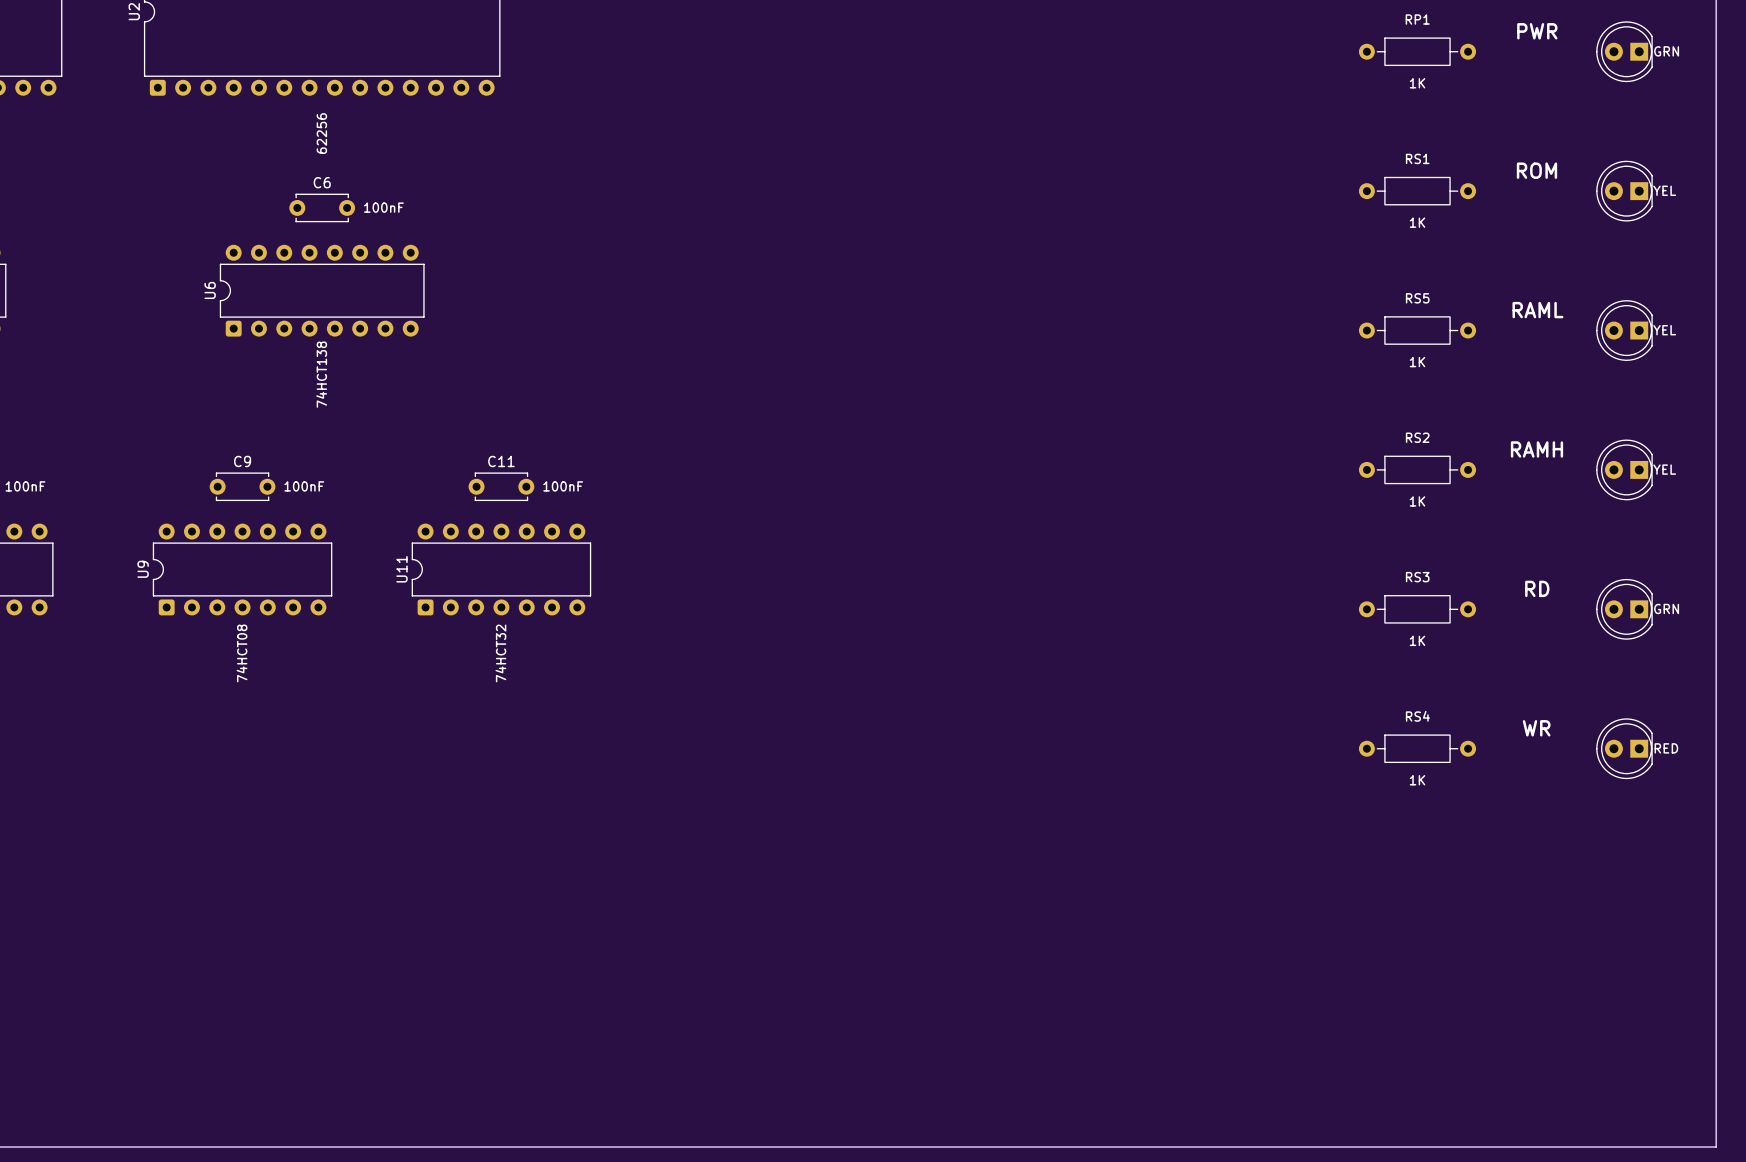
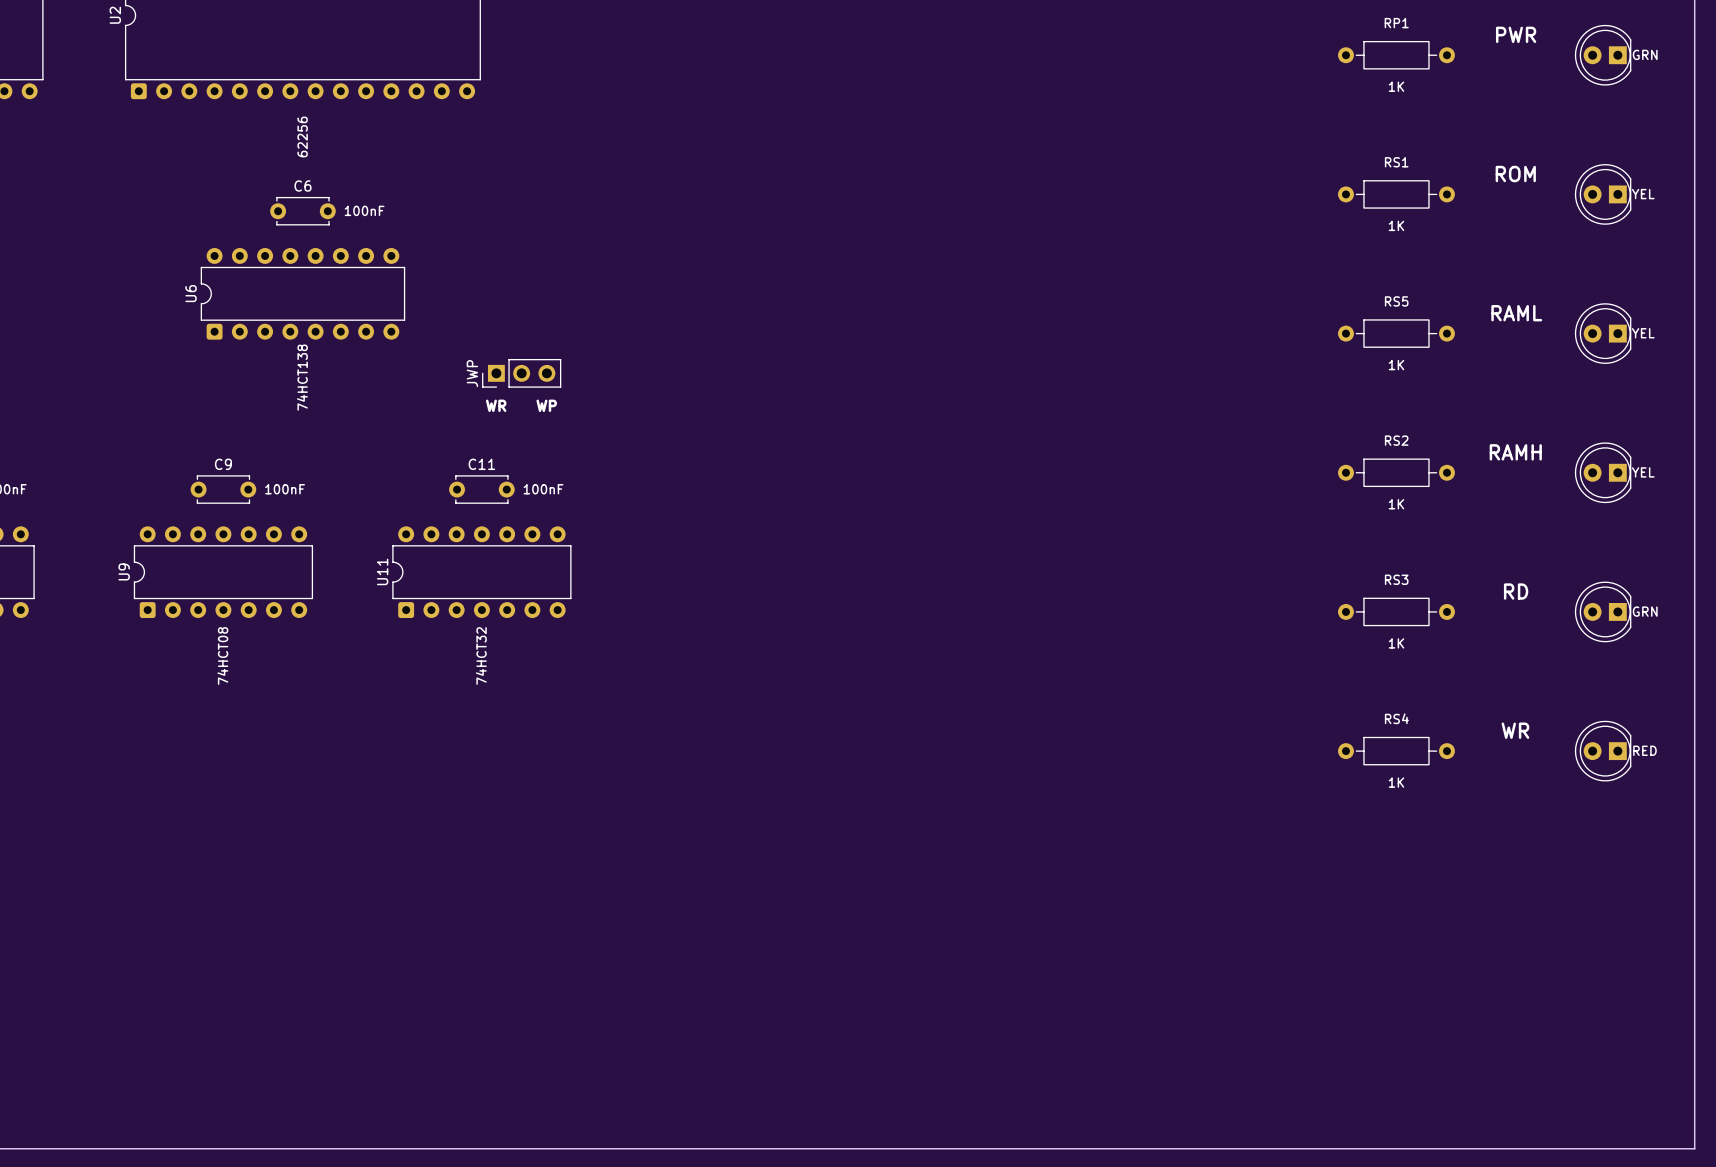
JWP: none -> (521, 373)
text: none -> WR (496, 405)
text: none -> WP (546, 405)

